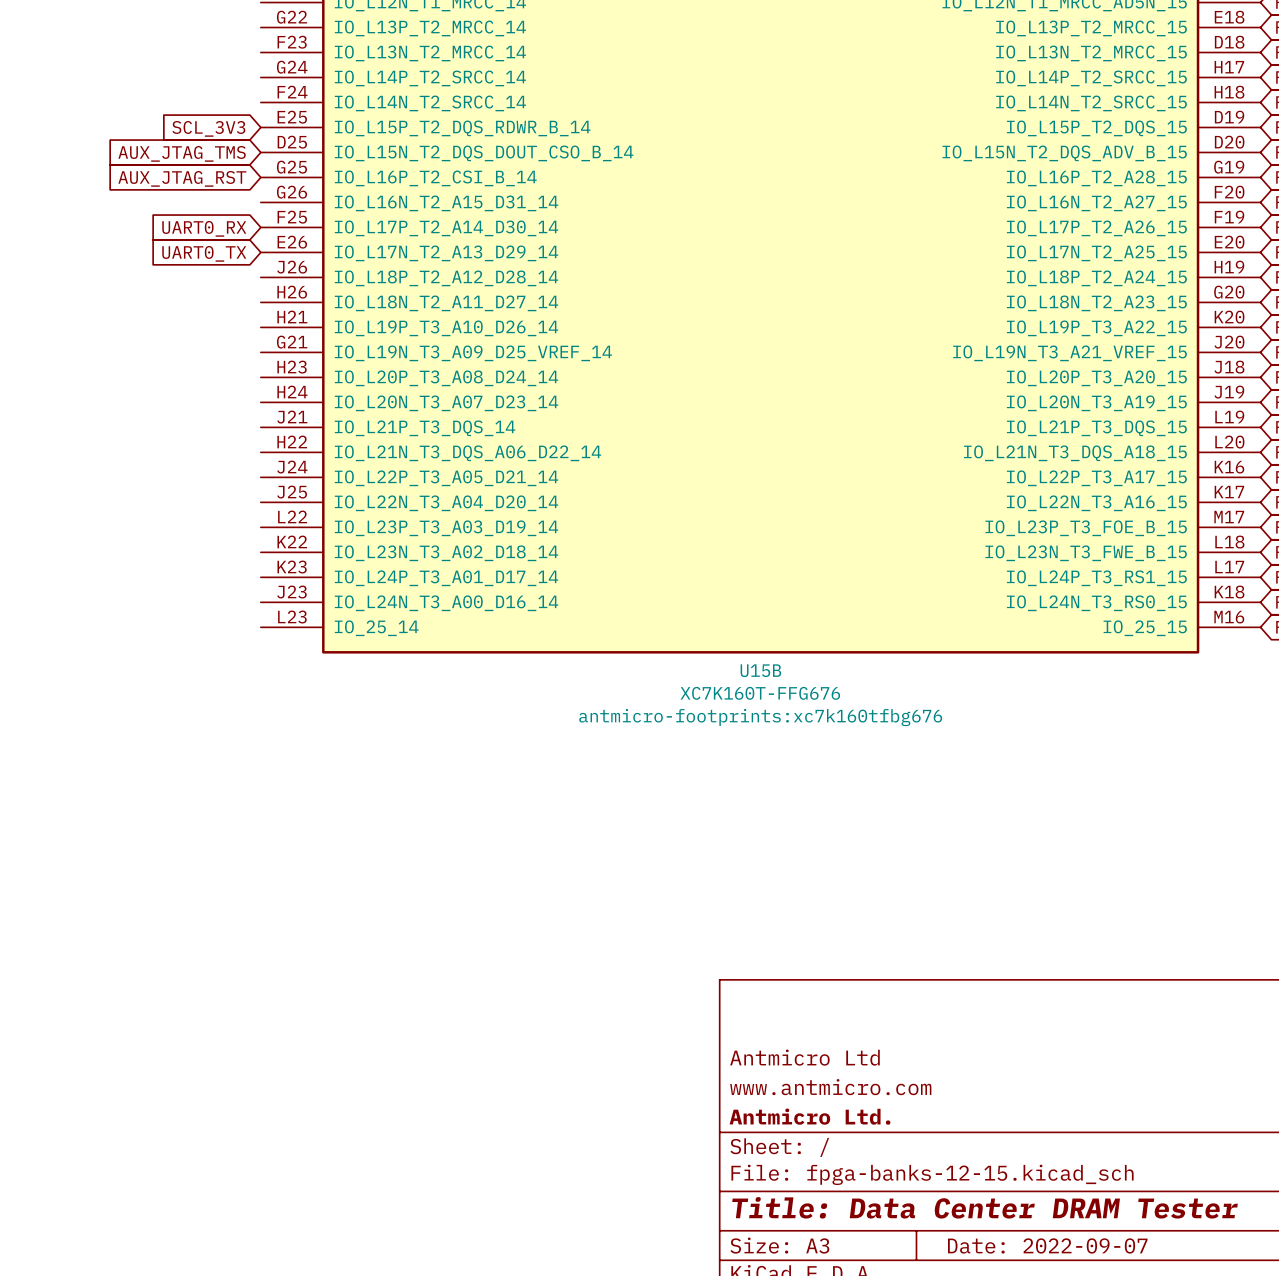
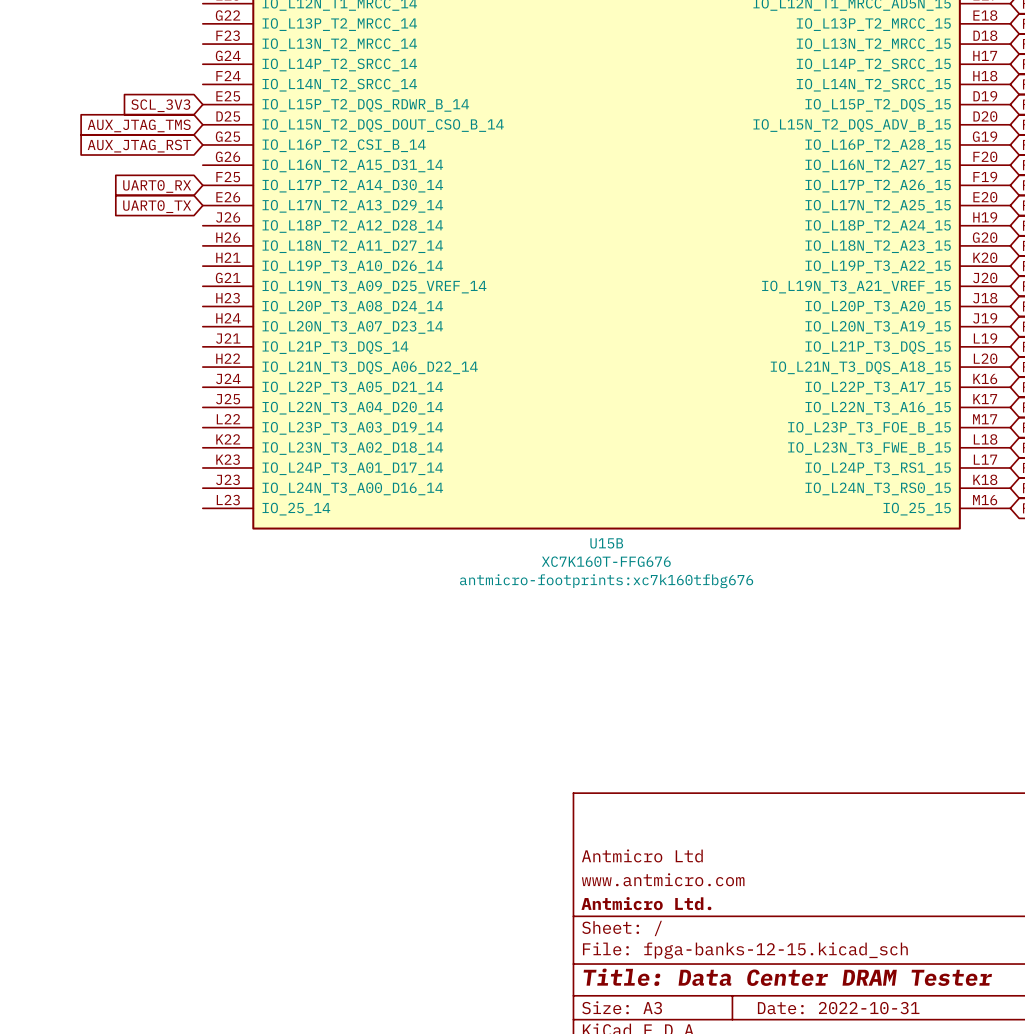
title block: Date: 2022-09-07 (1047, 1245) -> Date: 2022-10-31 (838, 1008)

